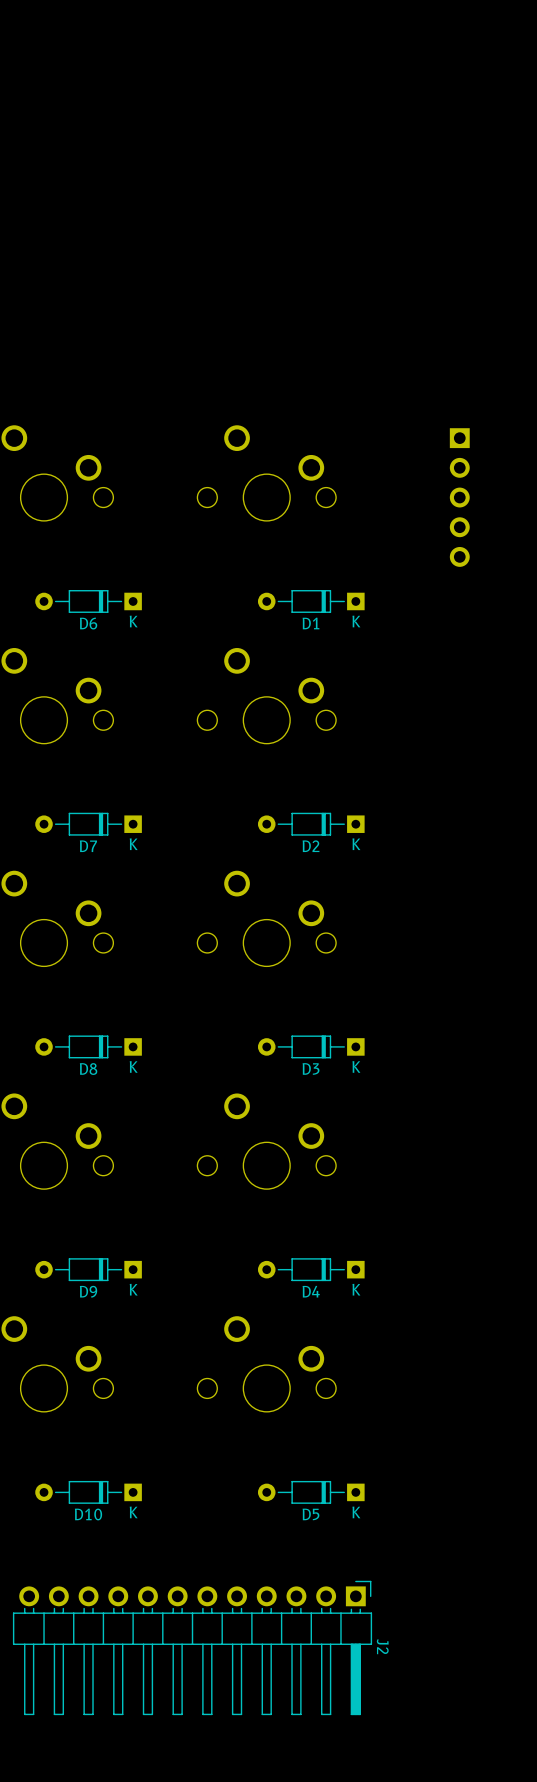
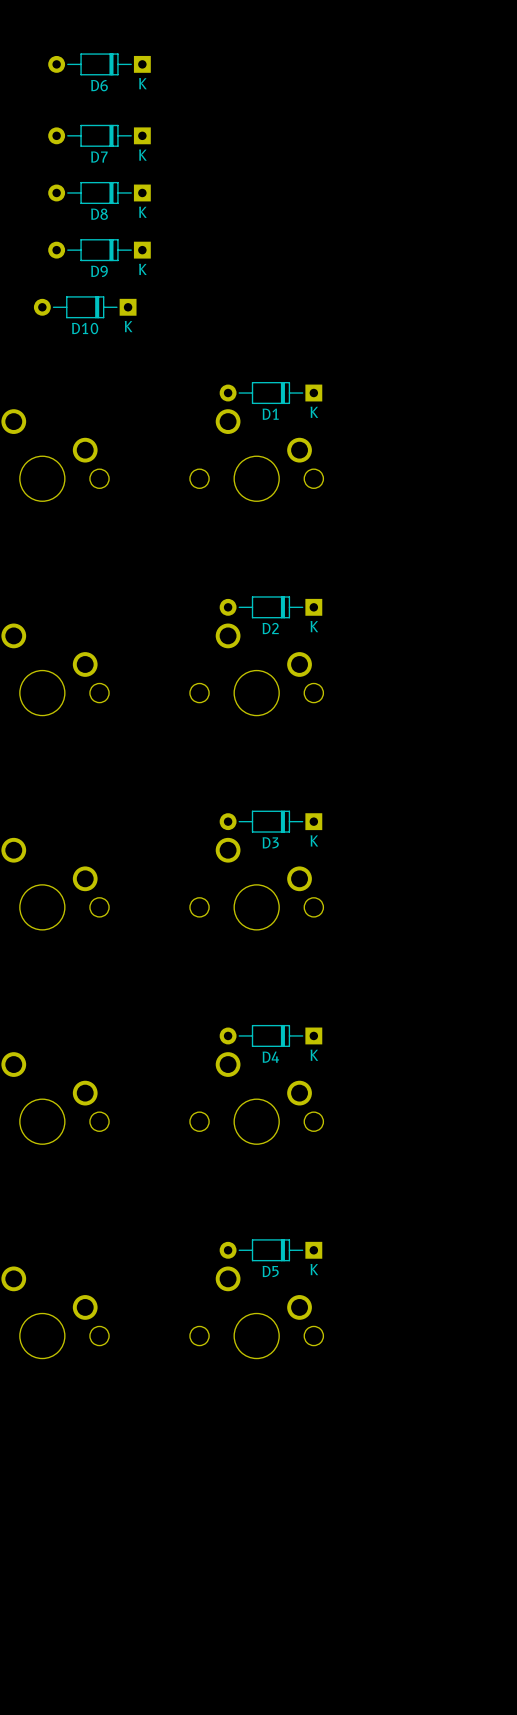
part: (459, 497) -> none
D6 position: (88, 601) -> (99, 64)
D1 position: (311, 601) -> (270, 393)
D7 position: (88, 824) -> (99, 135)
D2 position: (311, 824) -> (270, 607)
D8 position: (88, 1046) -> (99, 192)
D3 position: (311, 1046) -> (270, 821)
D9 position: (88, 1269) -> (99, 250)
D4 position: (311, 1269) -> (270, 1035)
D10 position: (88, 1492) -> (85, 307)
D5 position: (311, 1492) -> (270, 1250)
J2: (192, 1647) -> none

